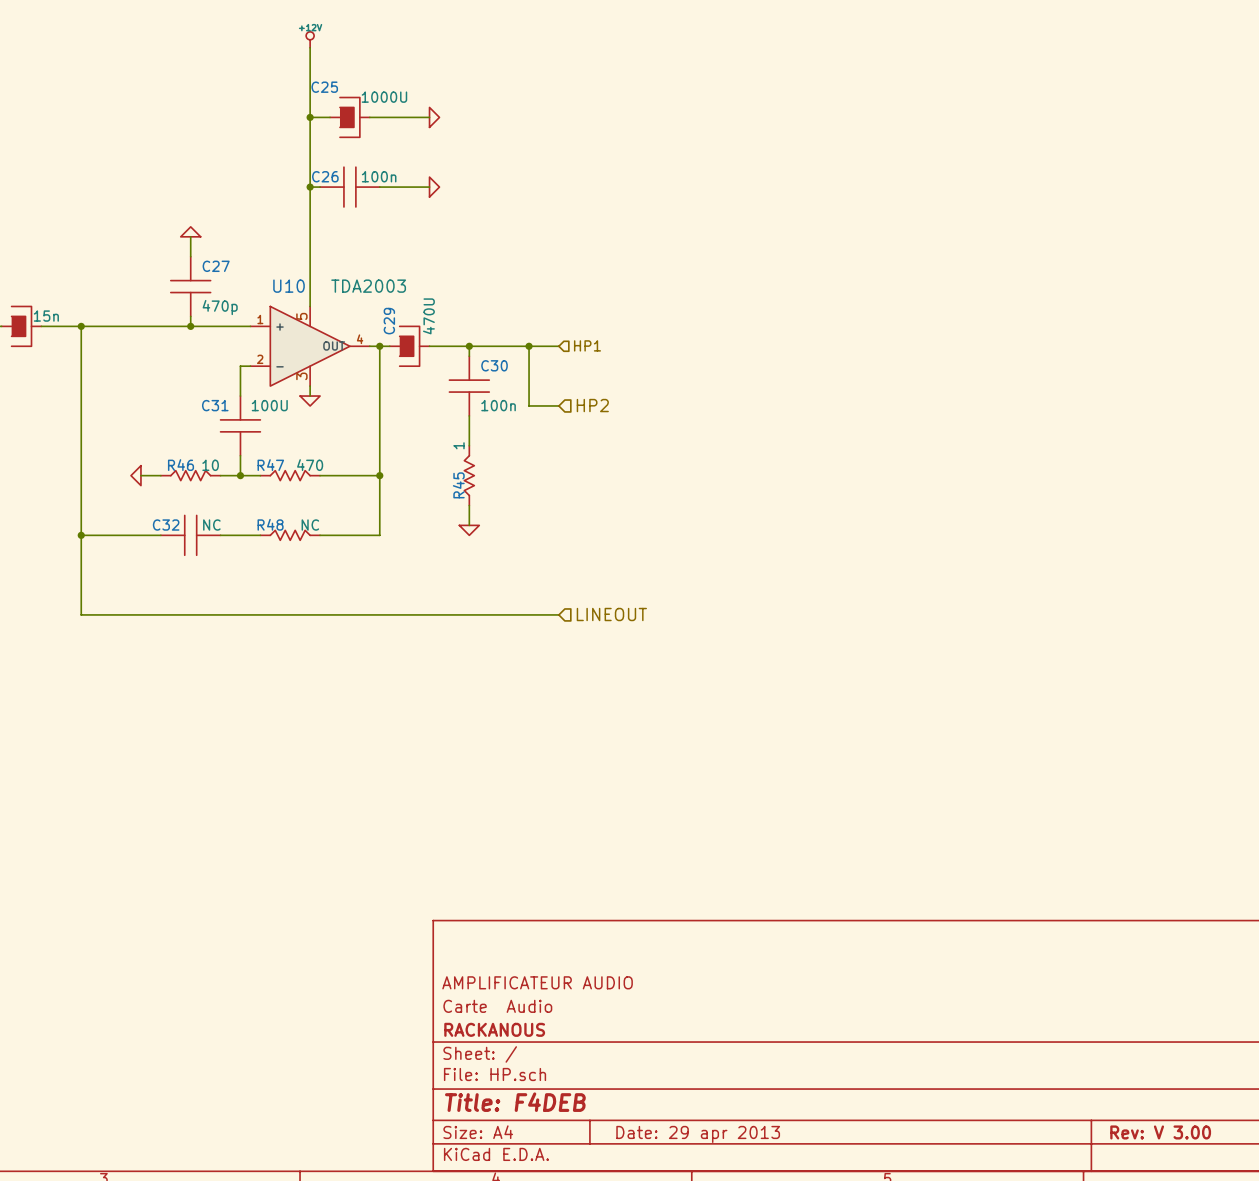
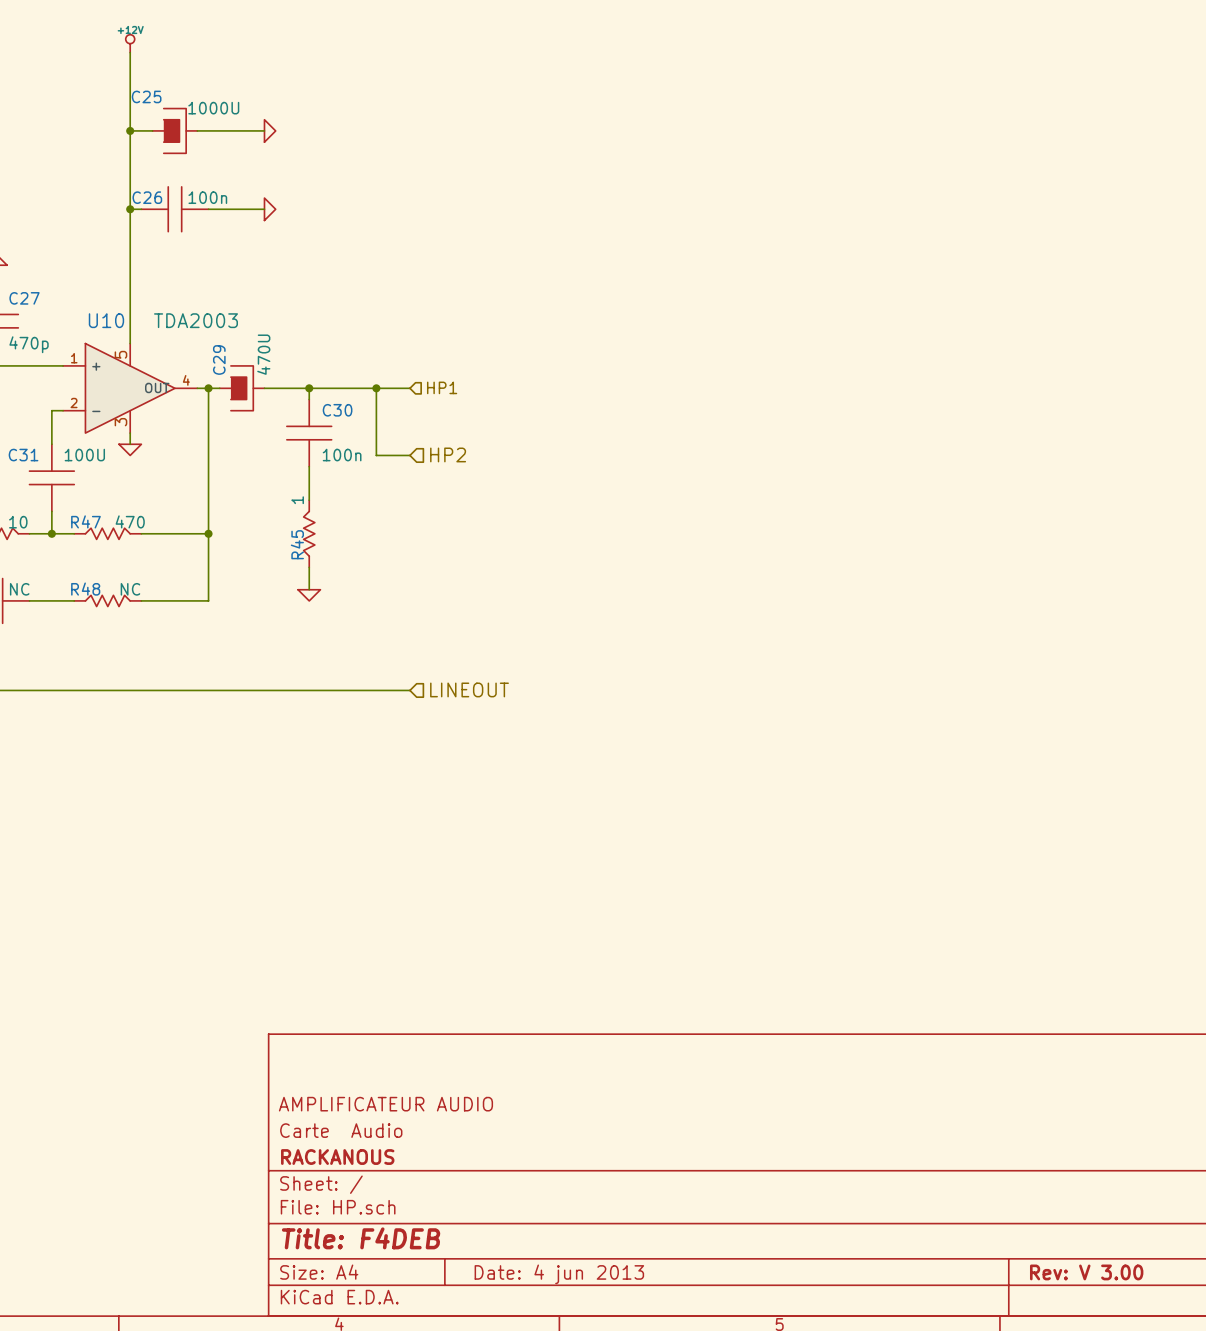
title block: Date: 29 apr 2013 (698, 1134) -> Date: 4 jun 2013 (559, 1274)

